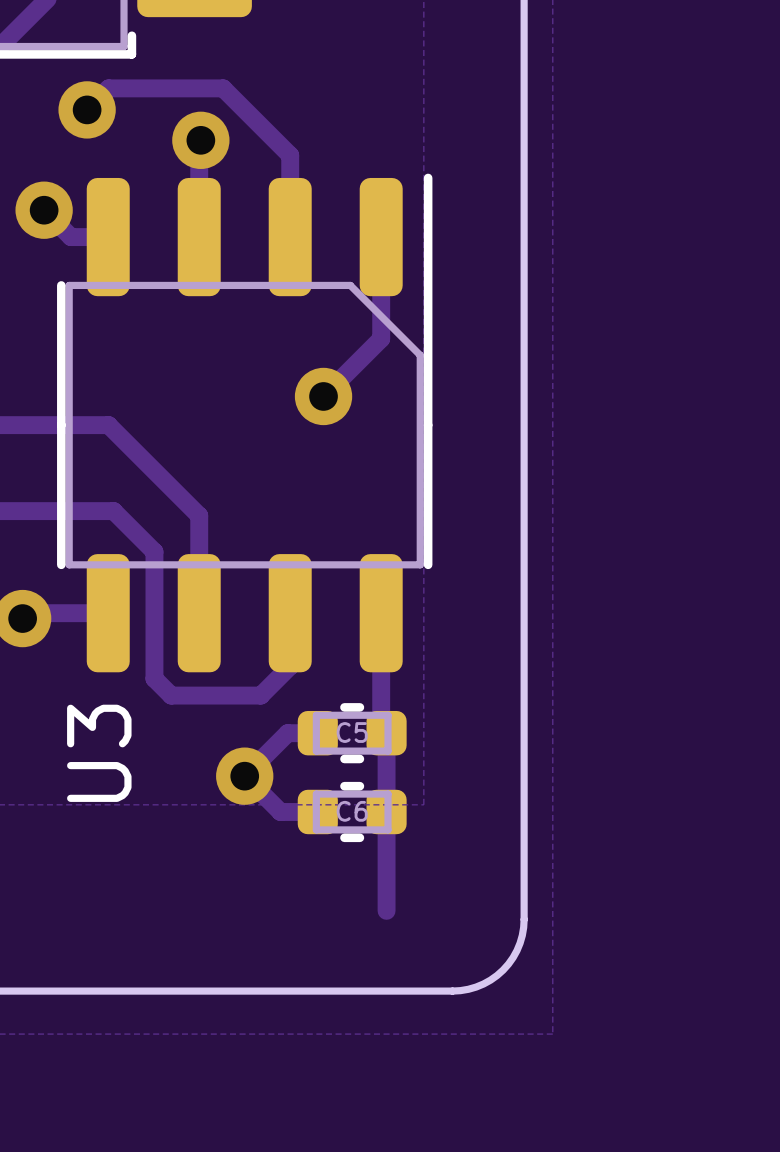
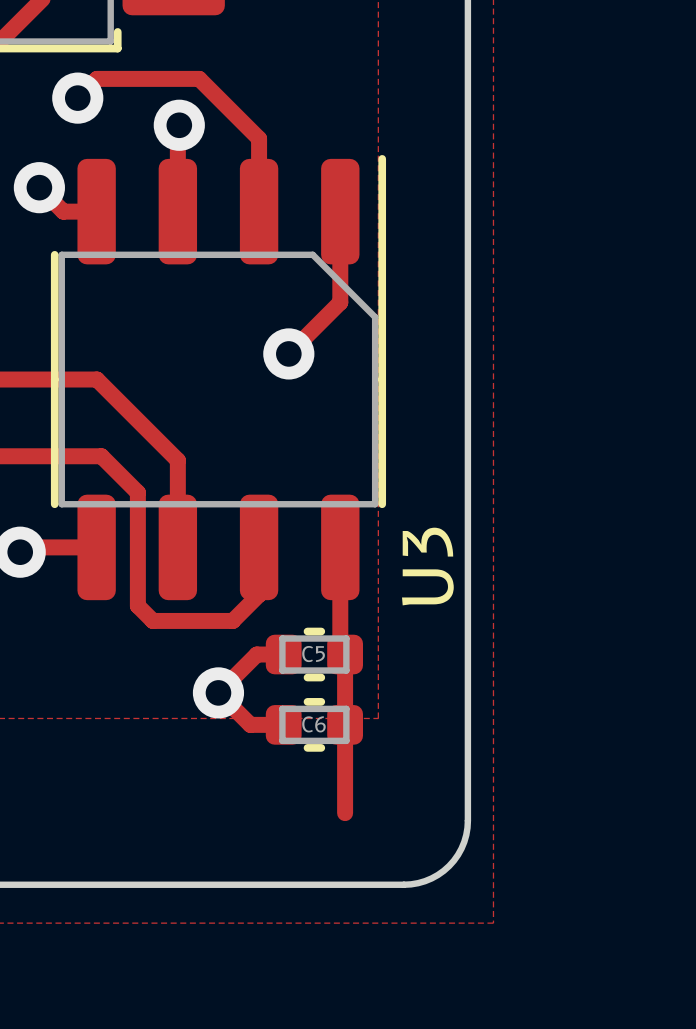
U3 name position: U3 (99, 753) -> U3 (427, 566)

